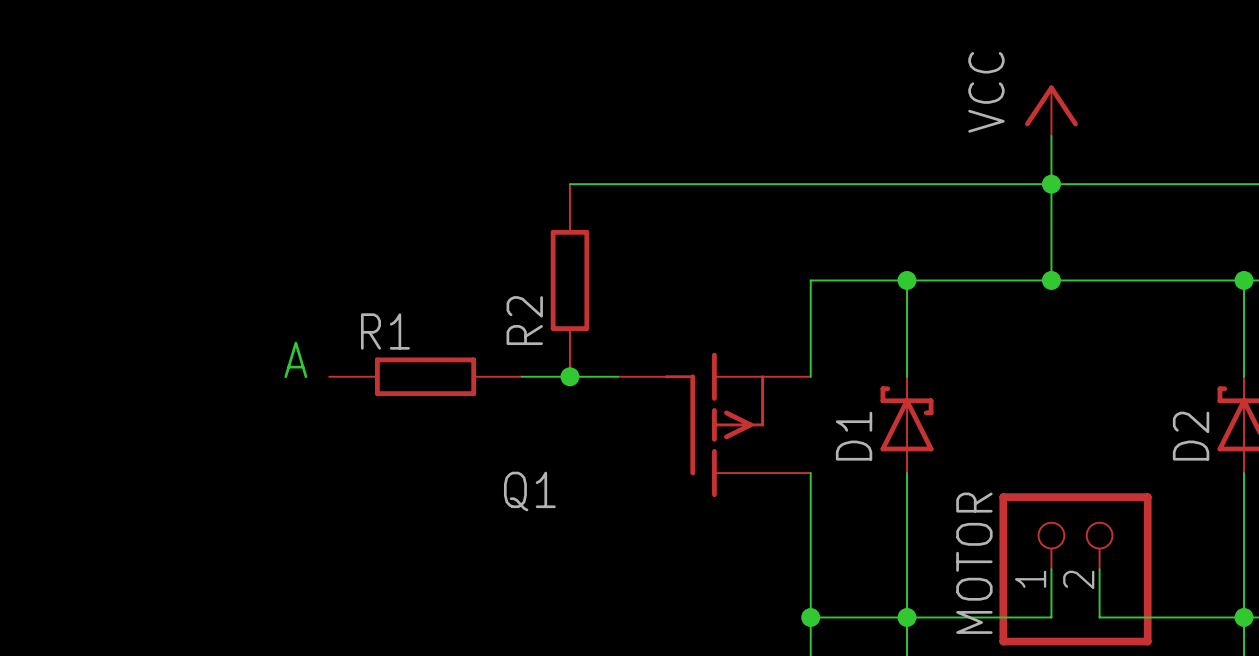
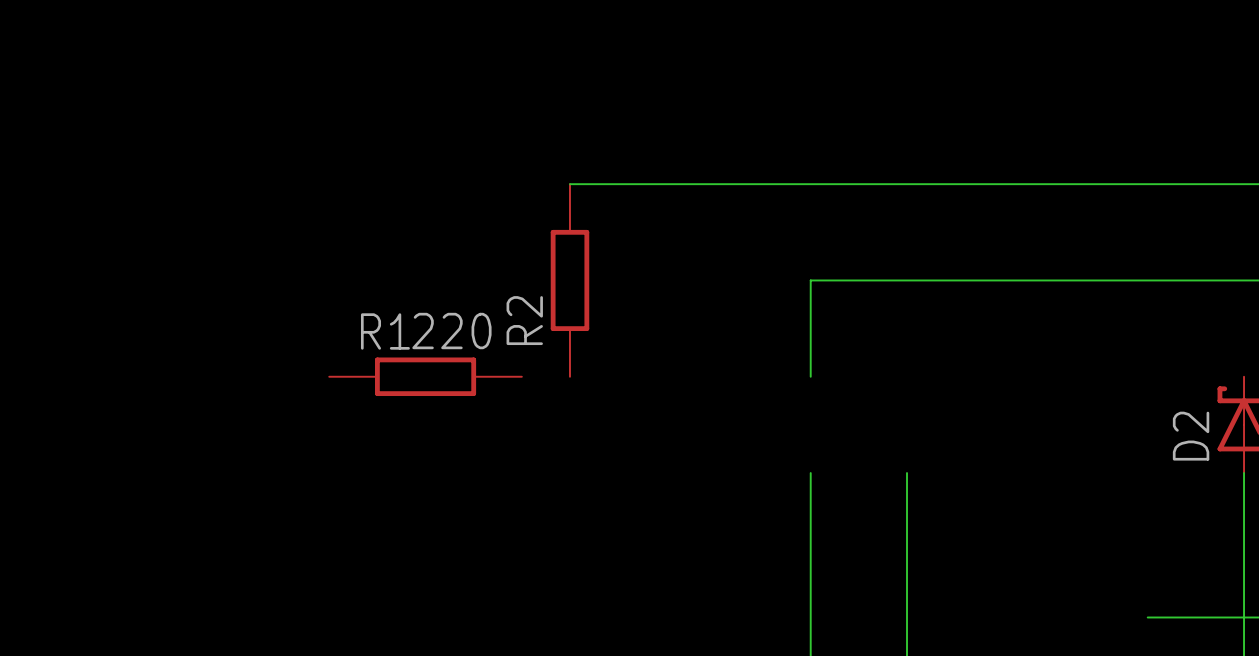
power symbol: VCC (1051, 110) -> none
wire: (1051, 136) (1051, 280) -> none
junction: (1051, 184) -> none
wire: (907, 280) (907, 376) -> none
junction: (907, 280) -> none
junction: (1051, 280) -> none
wire: (1244, 280) (1244, 376) -> none
junction: (1244, 280) -> none
R1 value: none -> 220 (451, 331)
text: A (295, 359) -> none
wire: (521, 376) (618, 376) -> none
junction: (569, 376) -> none
Q1: (714, 424) -> none
D1: (907, 424) -> none
wire: (1051, 569) (1051, 617) (810, 617) -> none
MOTOR: (1075, 569) -> none
wire: (1099, 569) (1099, 617) (1147, 617) -> none
junction: (810, 617) -> none
junction: (907, 617) -> none
junction: (1244, 617) -> none

